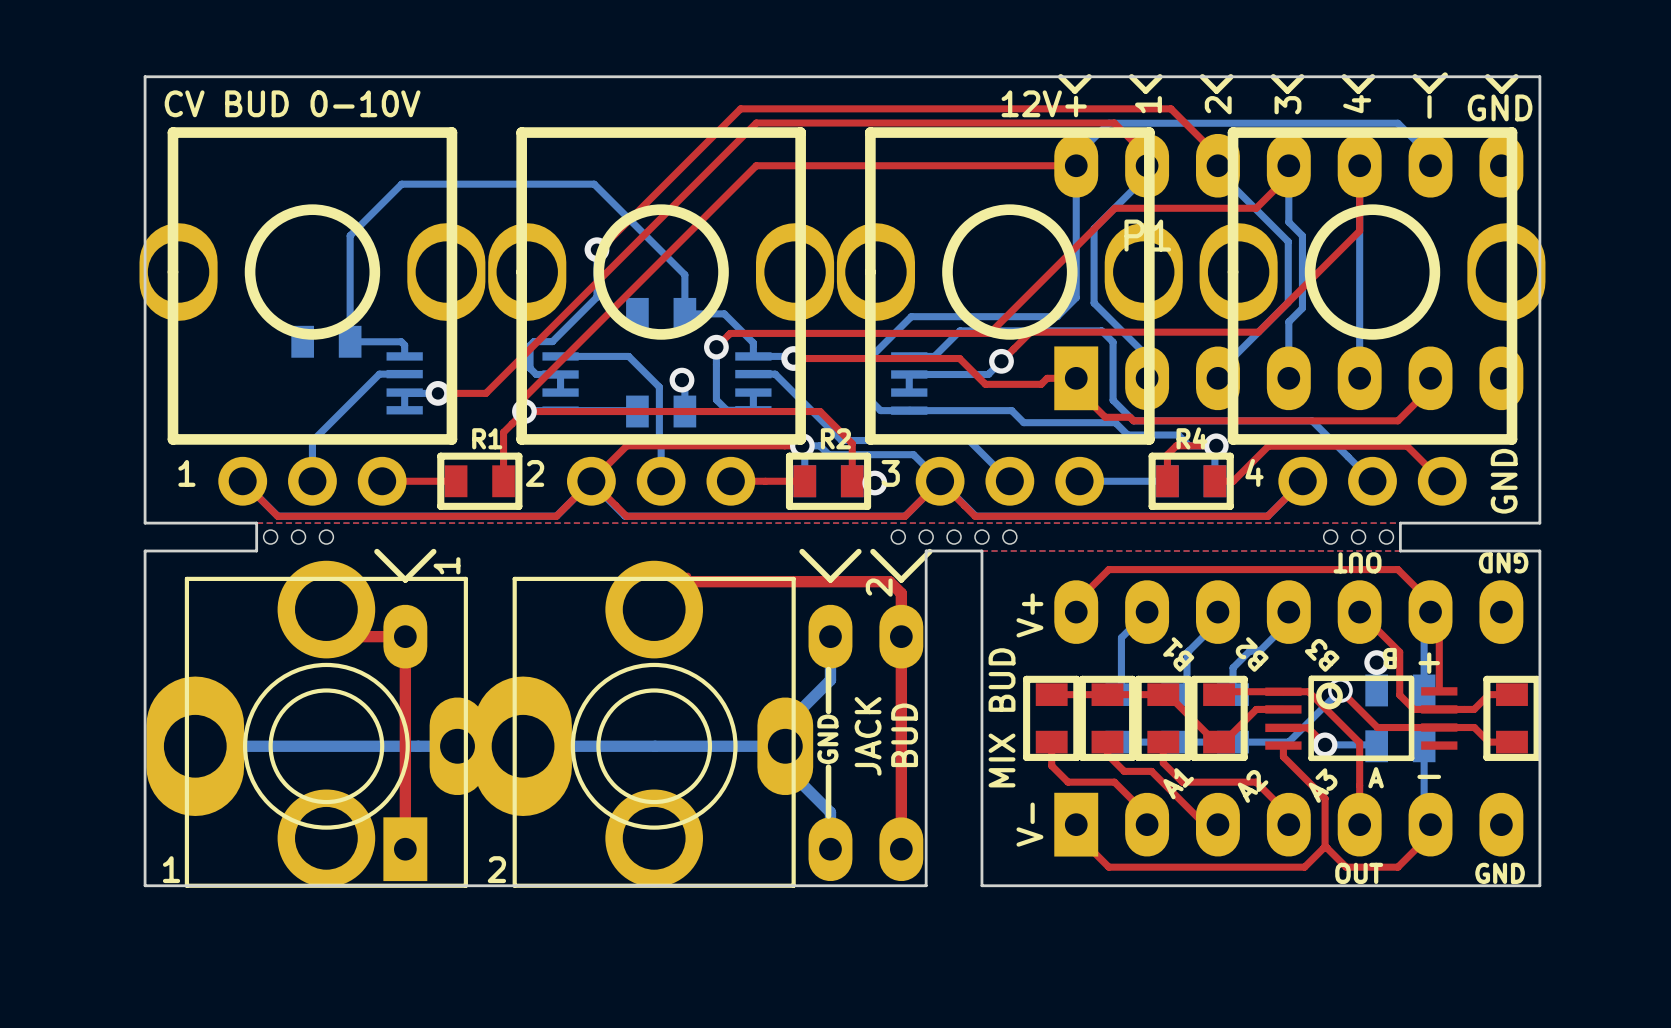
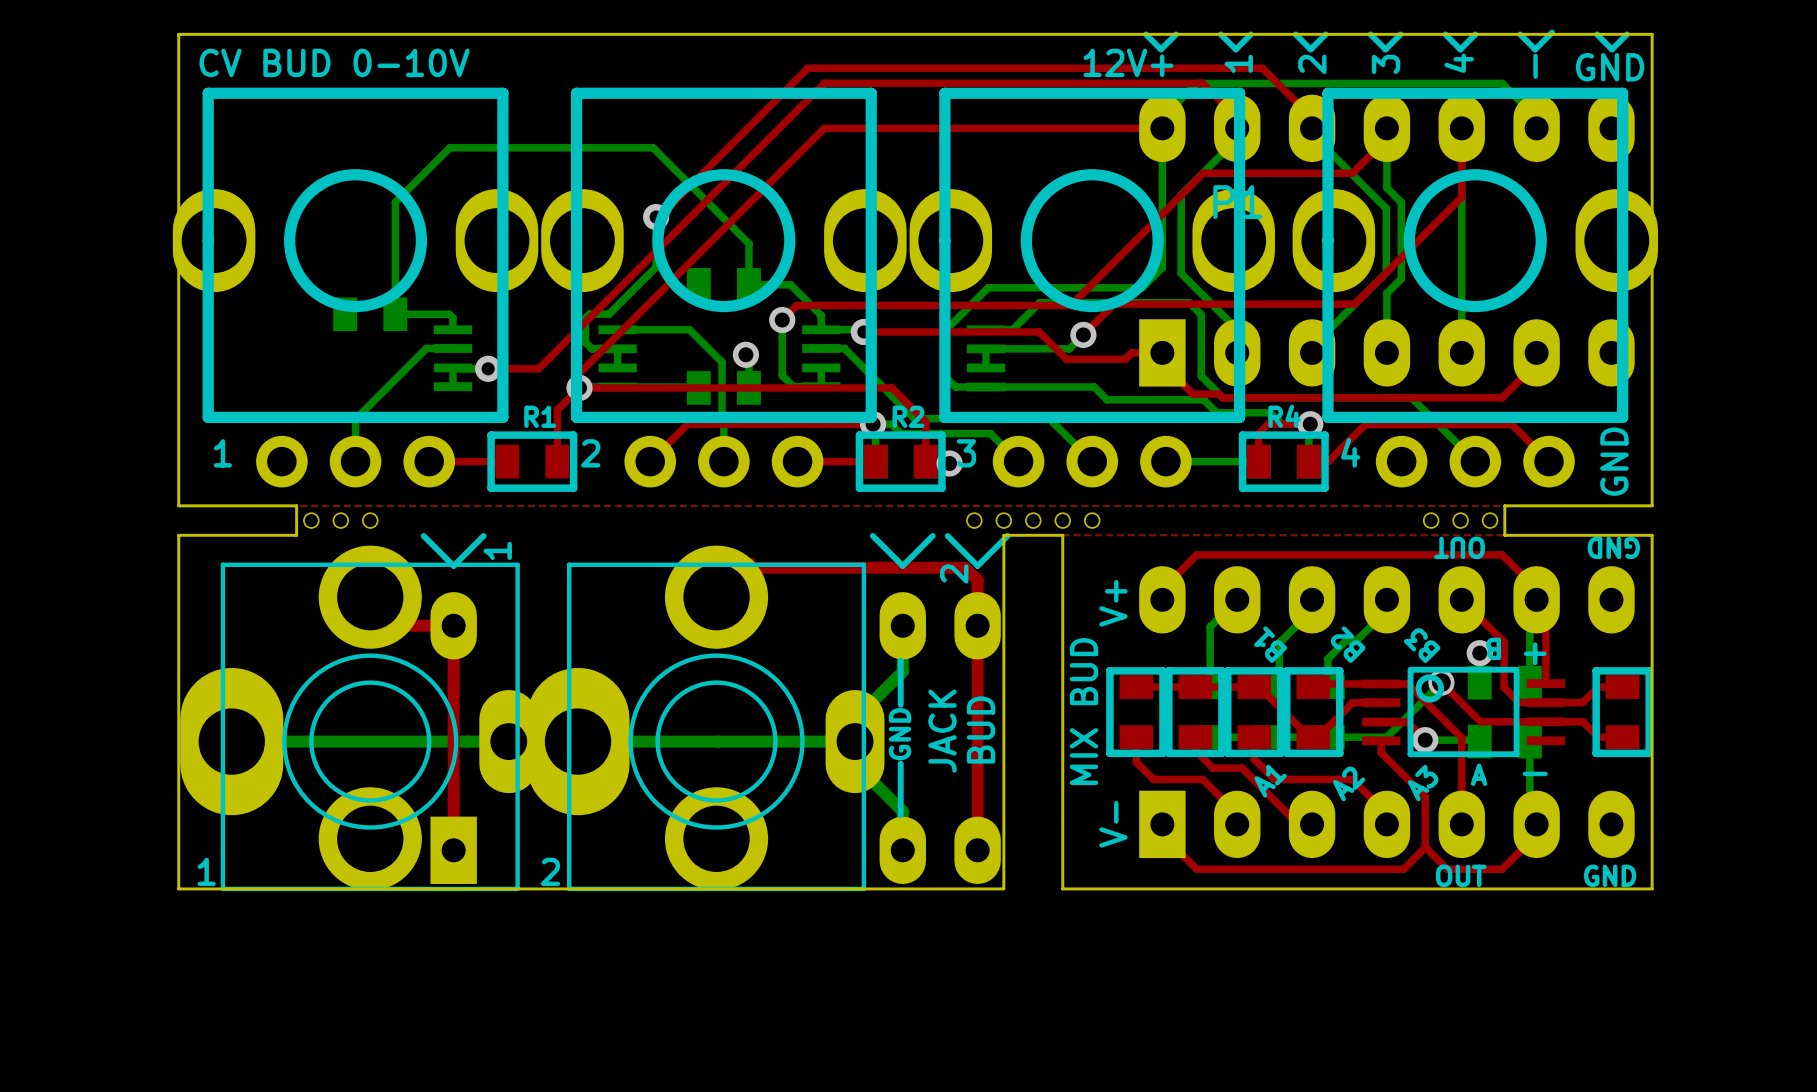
top track: (242, 481) (277, 516) (556, 516) (591, 481) (626, 516) (905, 516) (940, 481) (975, 516) (1267, 516) (1302, 481) -> none

